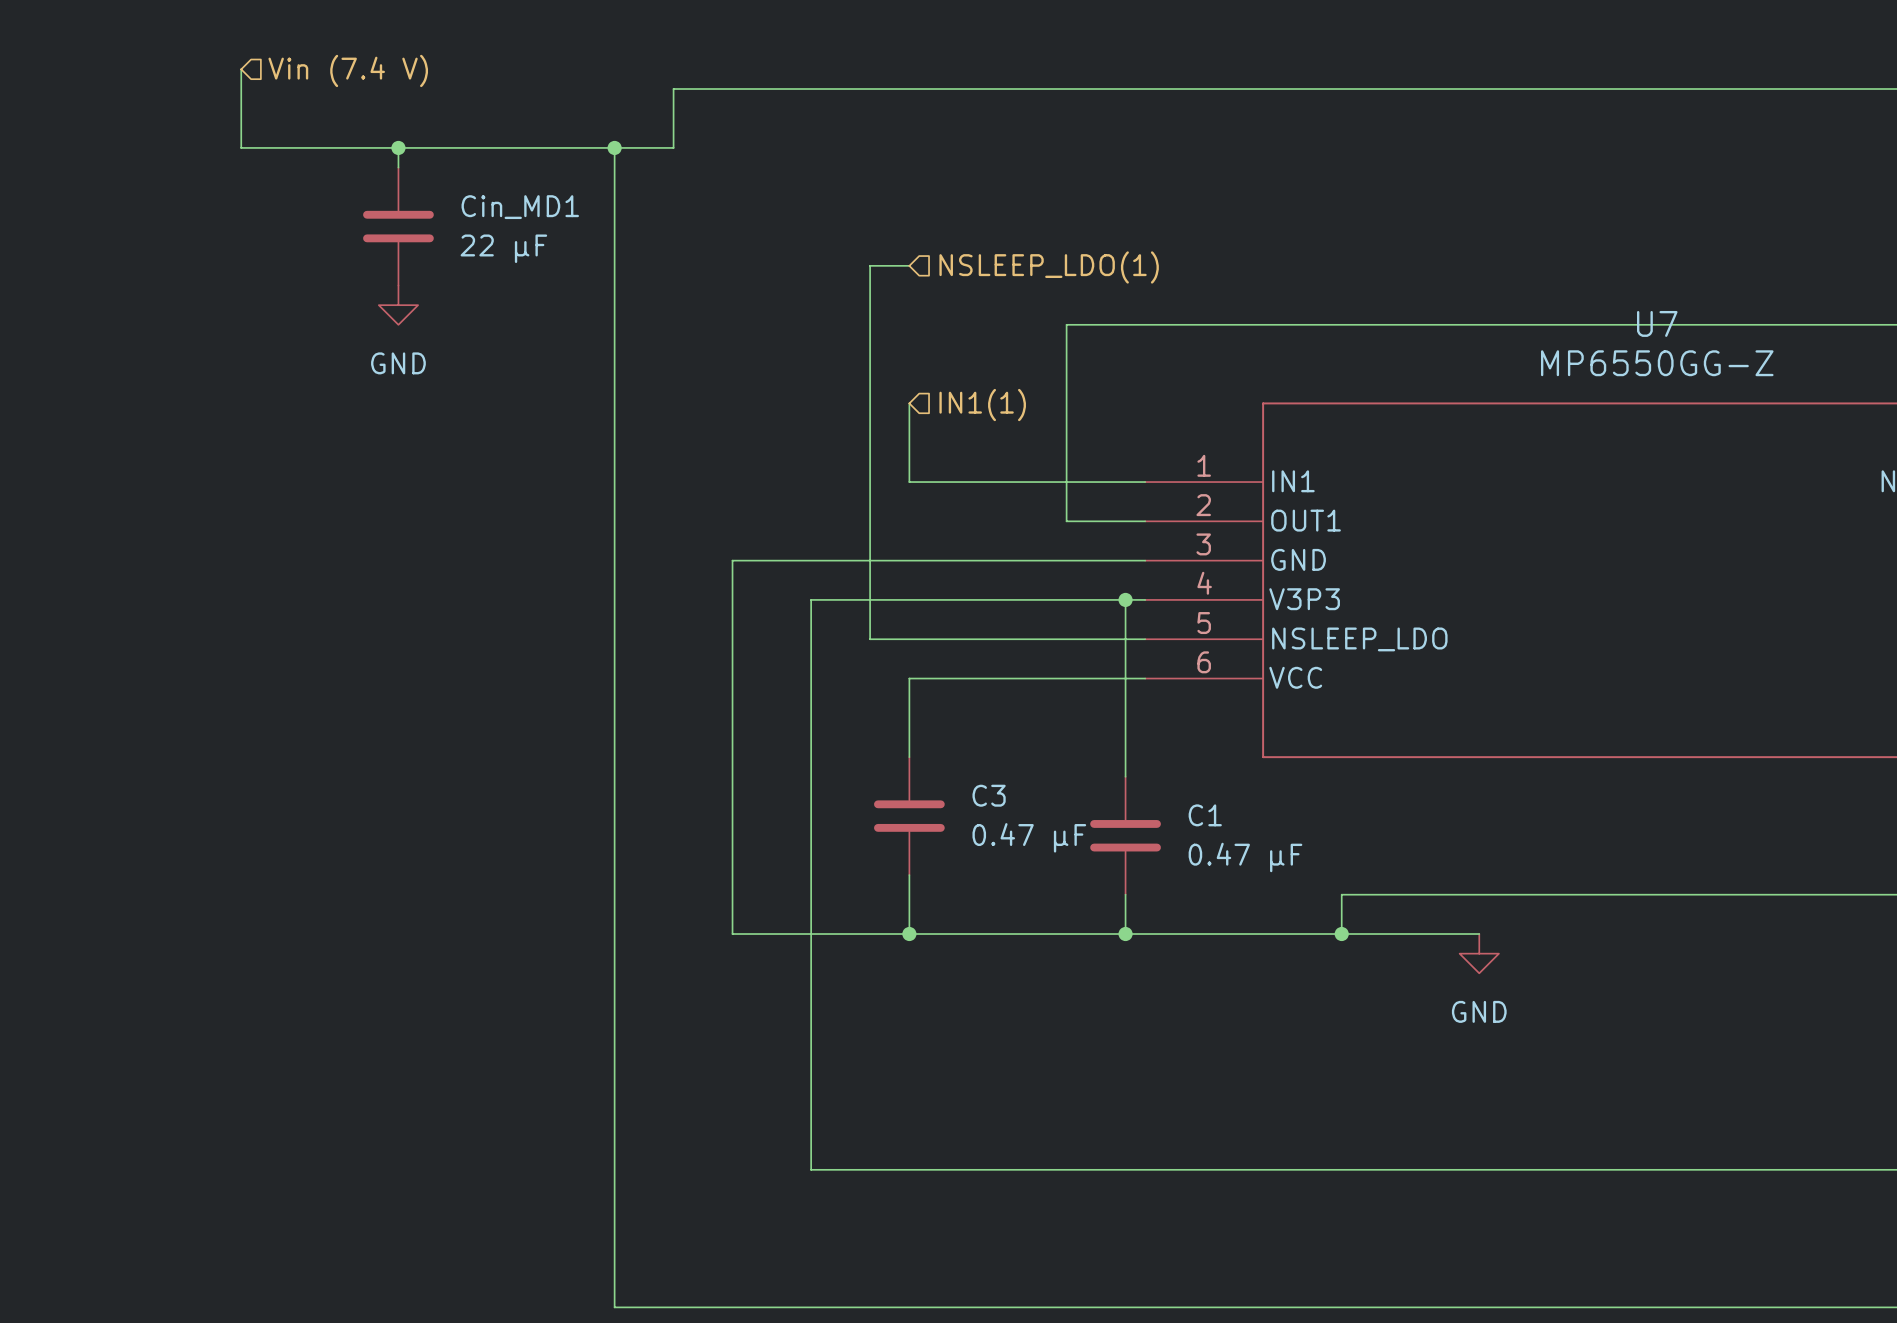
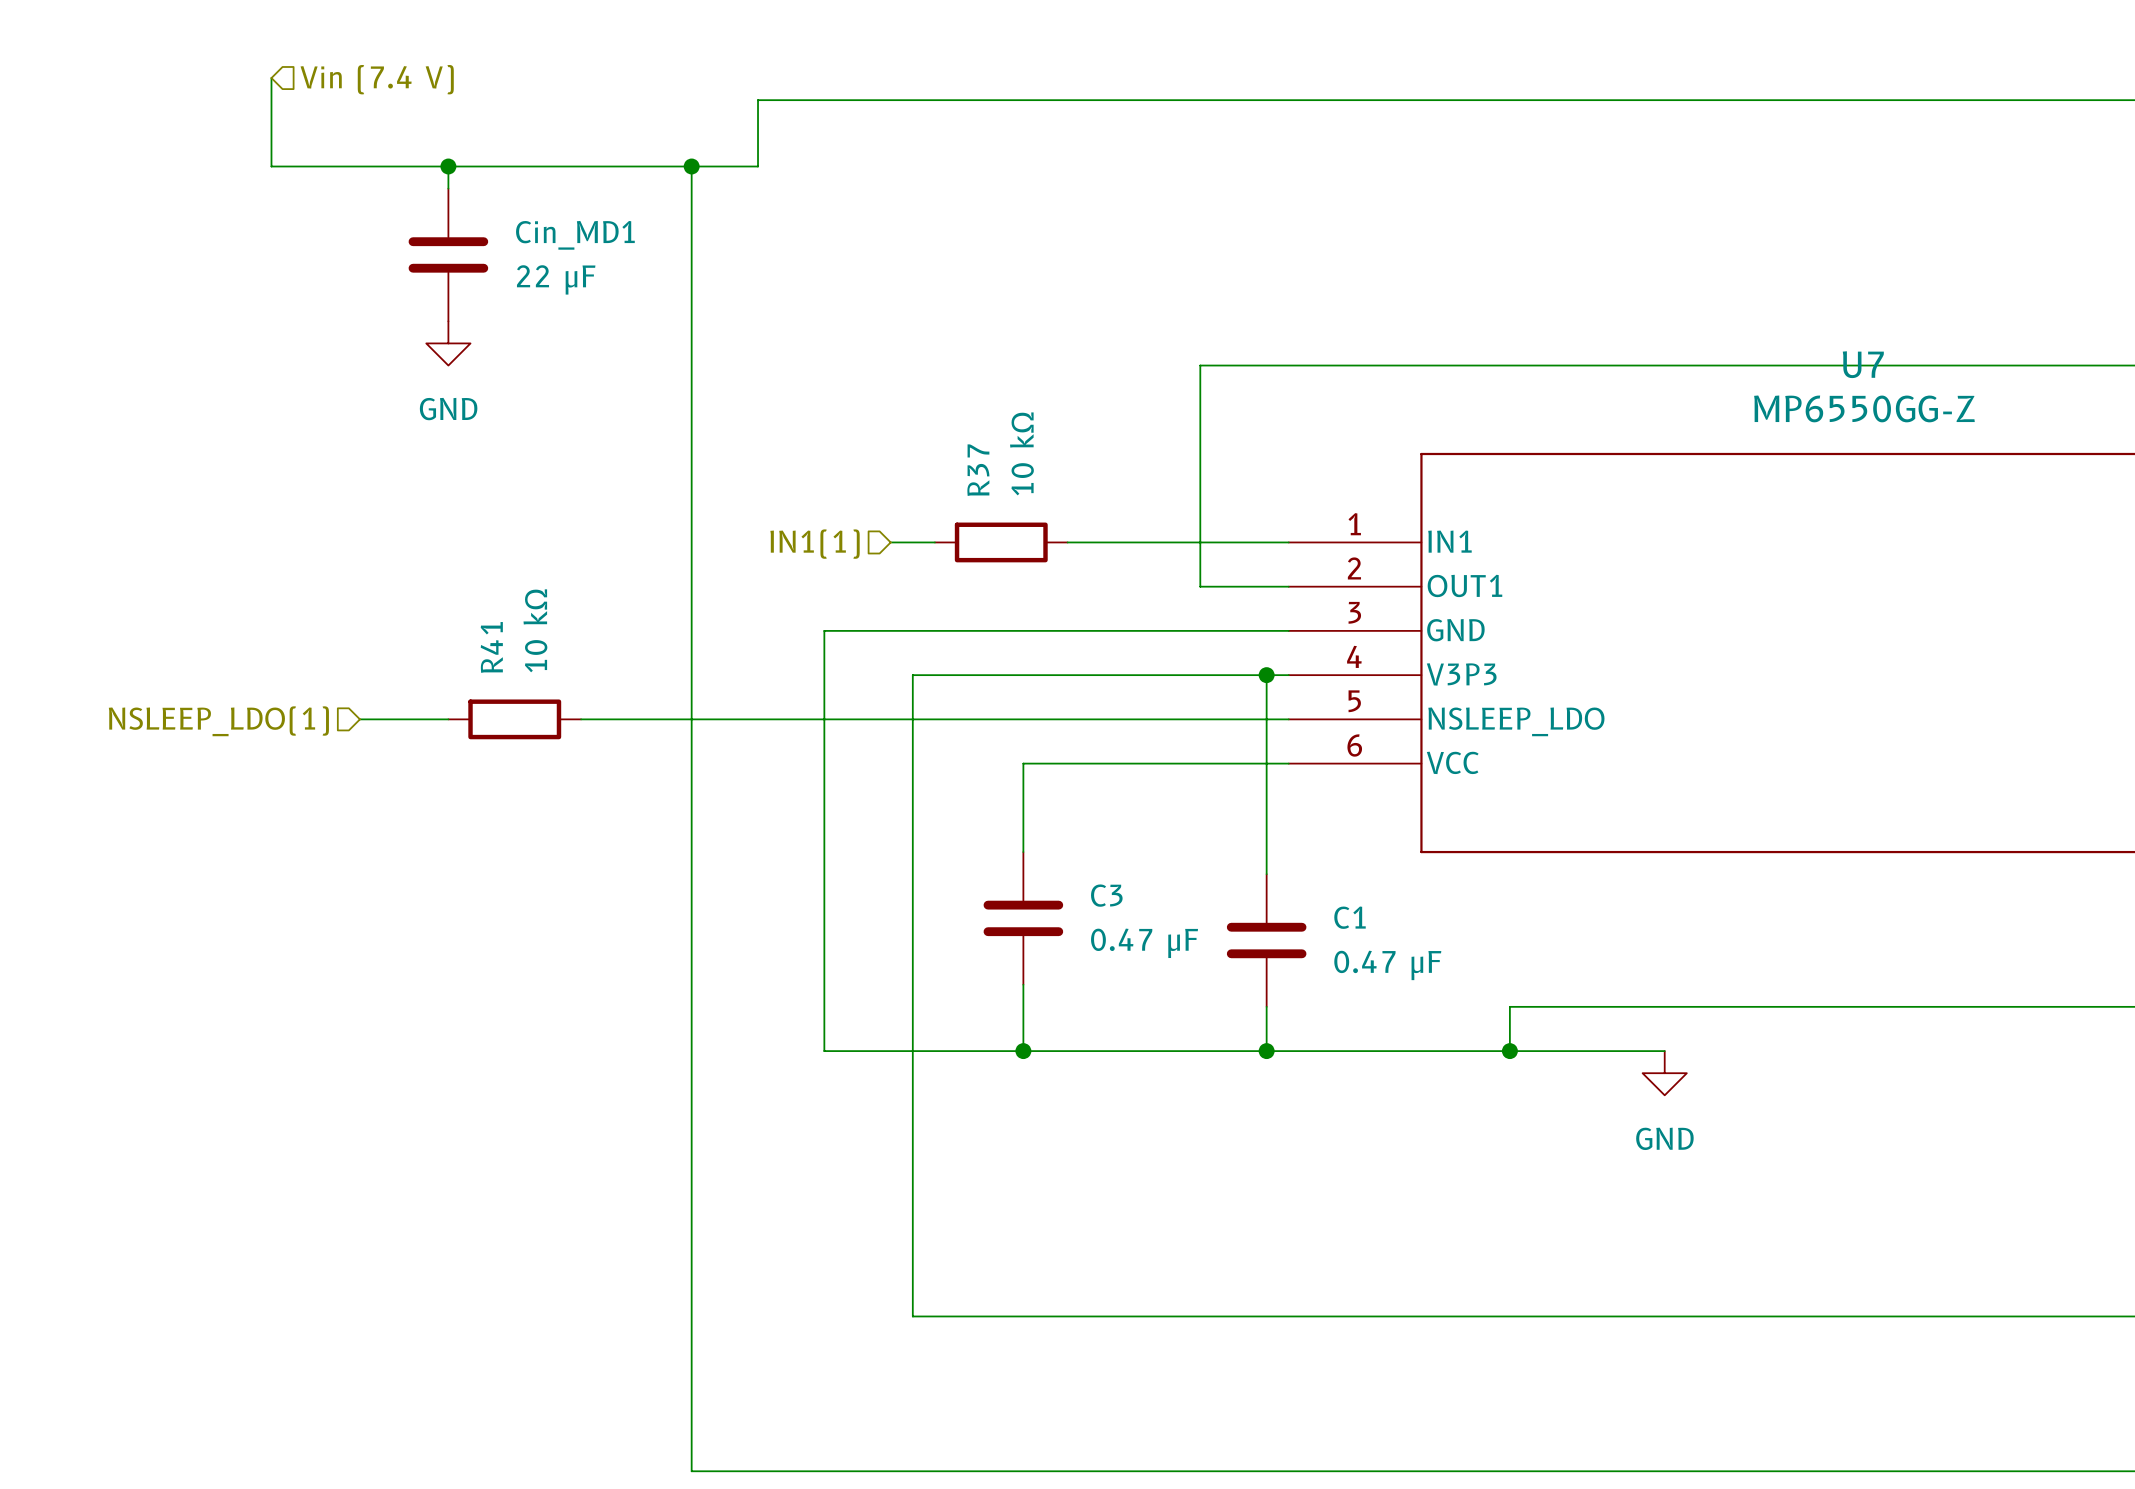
wire: (909, 265) (870, 265) (870, 639) -> (581, 719) (979, 719)
hierarchical label: NSLEEP_LDO(1) (1049, 267) -> none
wire: (909, 403) (909, 482) (948, 482) -> none
hierarchical label rotation: 0° (982, 405) -> 180° (815, 544)
hierarchical label position: IN1(1) (982, 405) -> IN1(1) (815, 544)
wire: none -> (890, 542) (934, 542)
R37: none -> 10 kΩ (1001, 542)
wire: none -> (359, 719) (448, 719)
R41: none -> 10 kΩ (514, 719)
hierarchical label: none -> NSLEEP_LDO(1) (218, 721)

